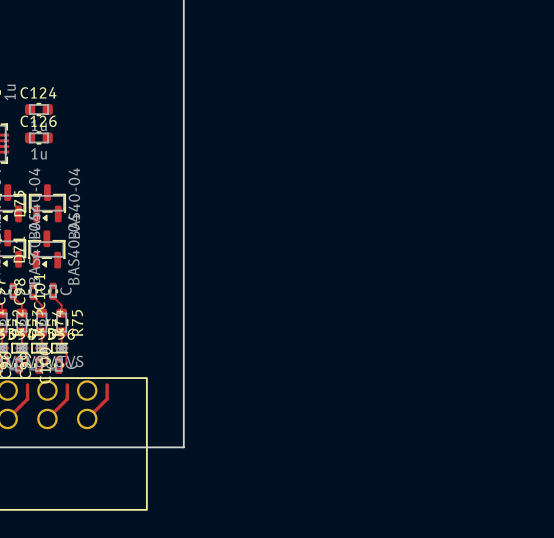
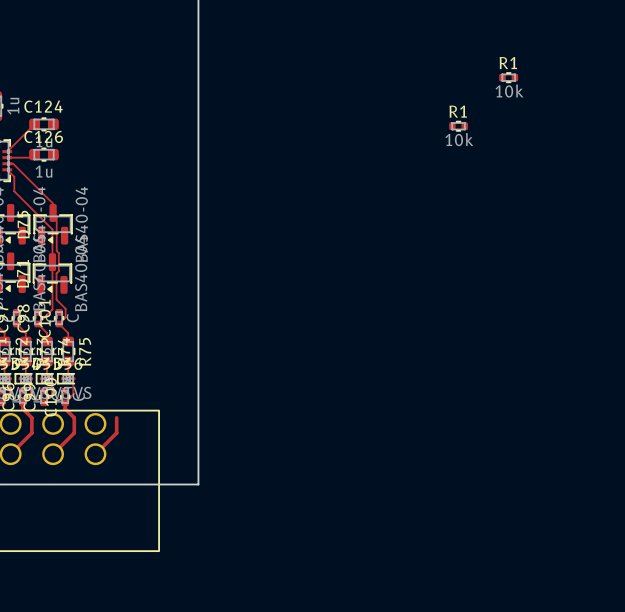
R1: none -> 10k (508, 77)
track: none -> (34, 124) (7, 151)
R1: none -> 10k (458, 126)
track: none -> (34, 154) (31, 157) (7, 157)
track: none -> (7, 163) (13, 163) (53, 203) (53, 212) (56, 216) (56, 250) (58, 253) (56, 299) (65, 308) (65, 317) (59, 323)
track: none -> (7, 169) (14, 176) (14, 191) (52, 229) (52, 309) (37, 323)
track: none -> (22, 402) (22, 408) (31, 417)
track: none -> (65, 402) (65, 408) (74, 417)

